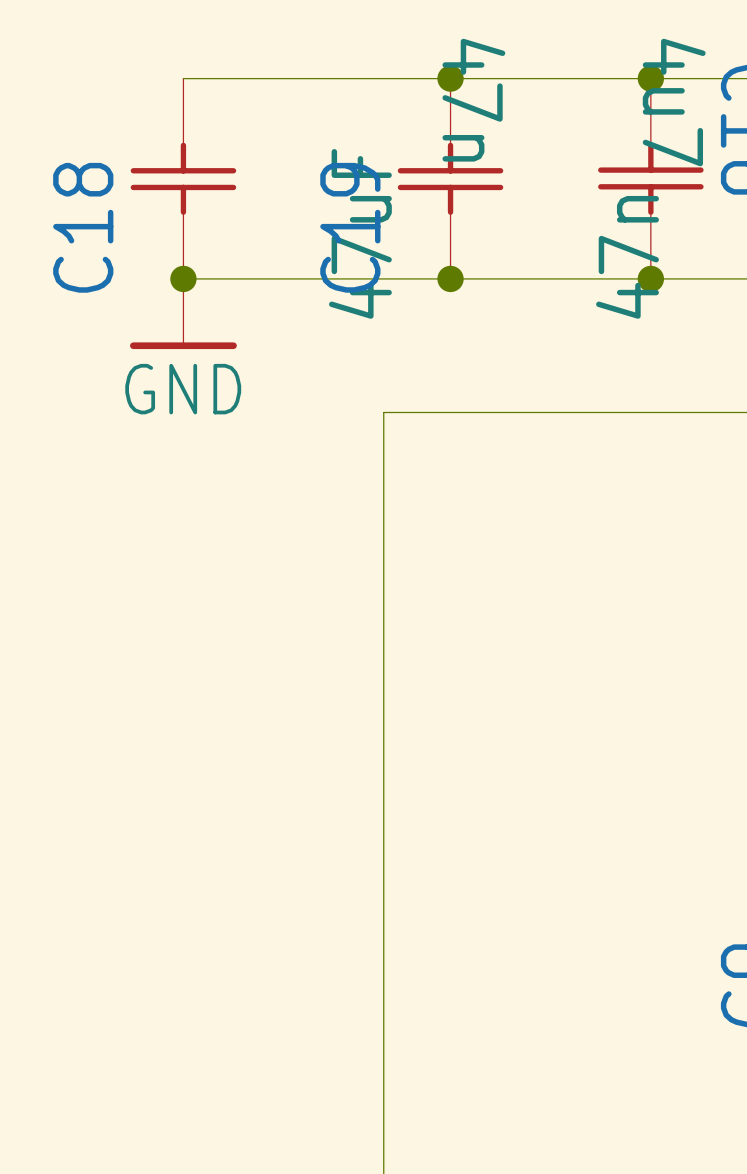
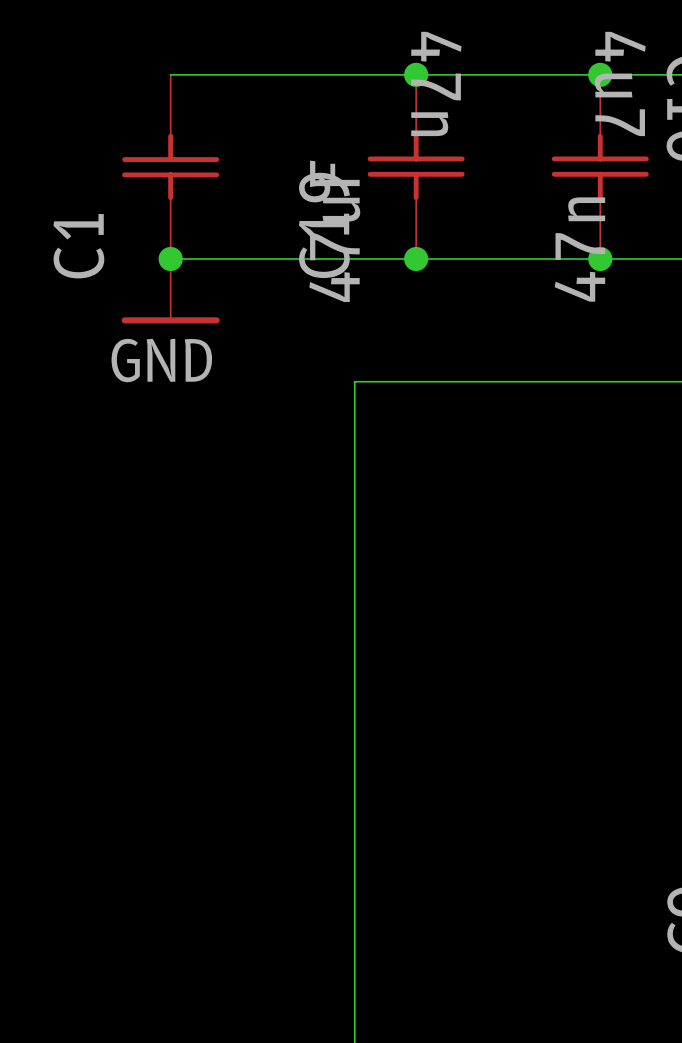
C18 name: C18 (83, 227) -> C1 (78, 246)

